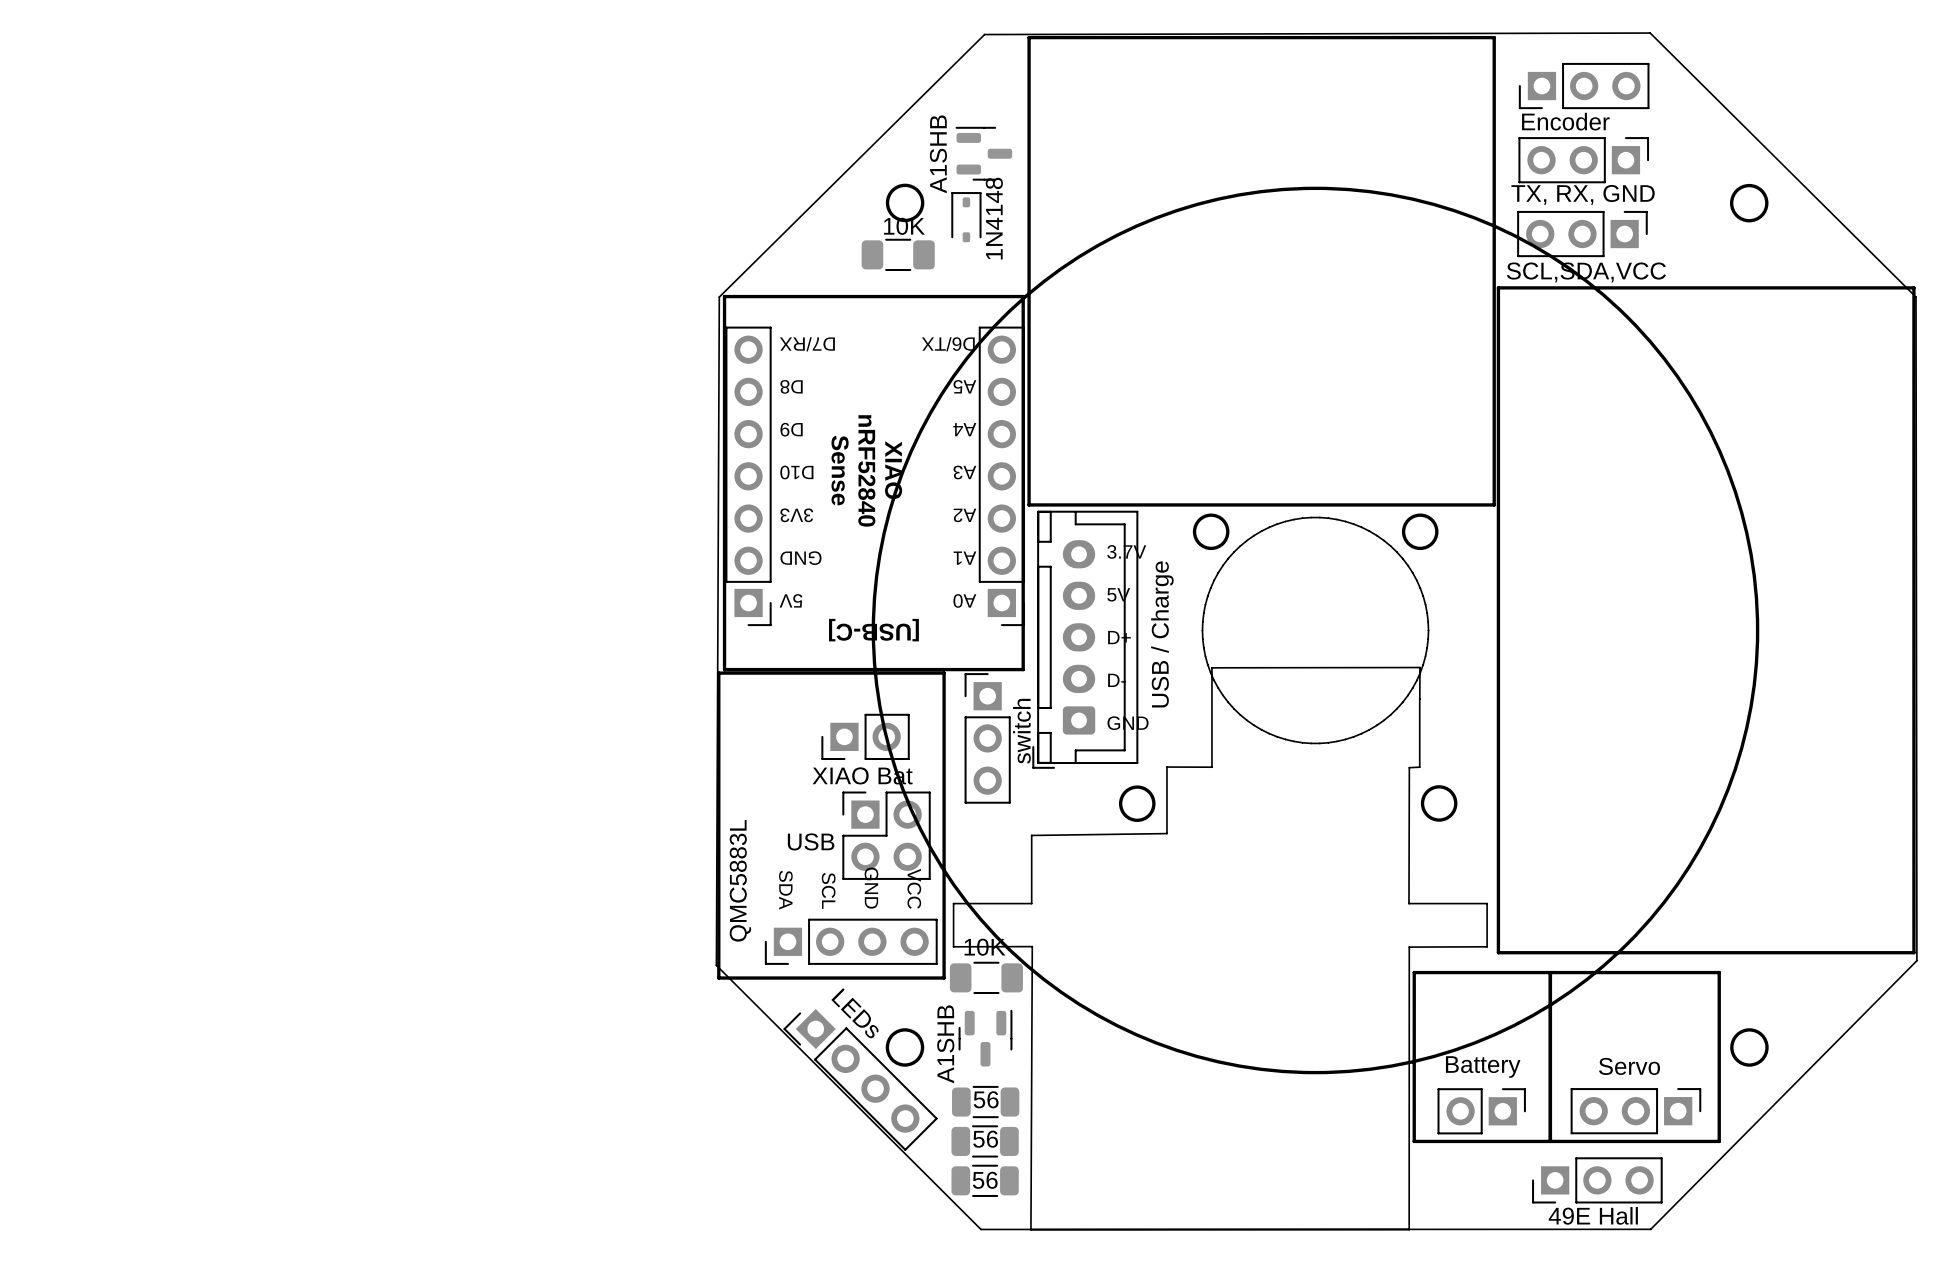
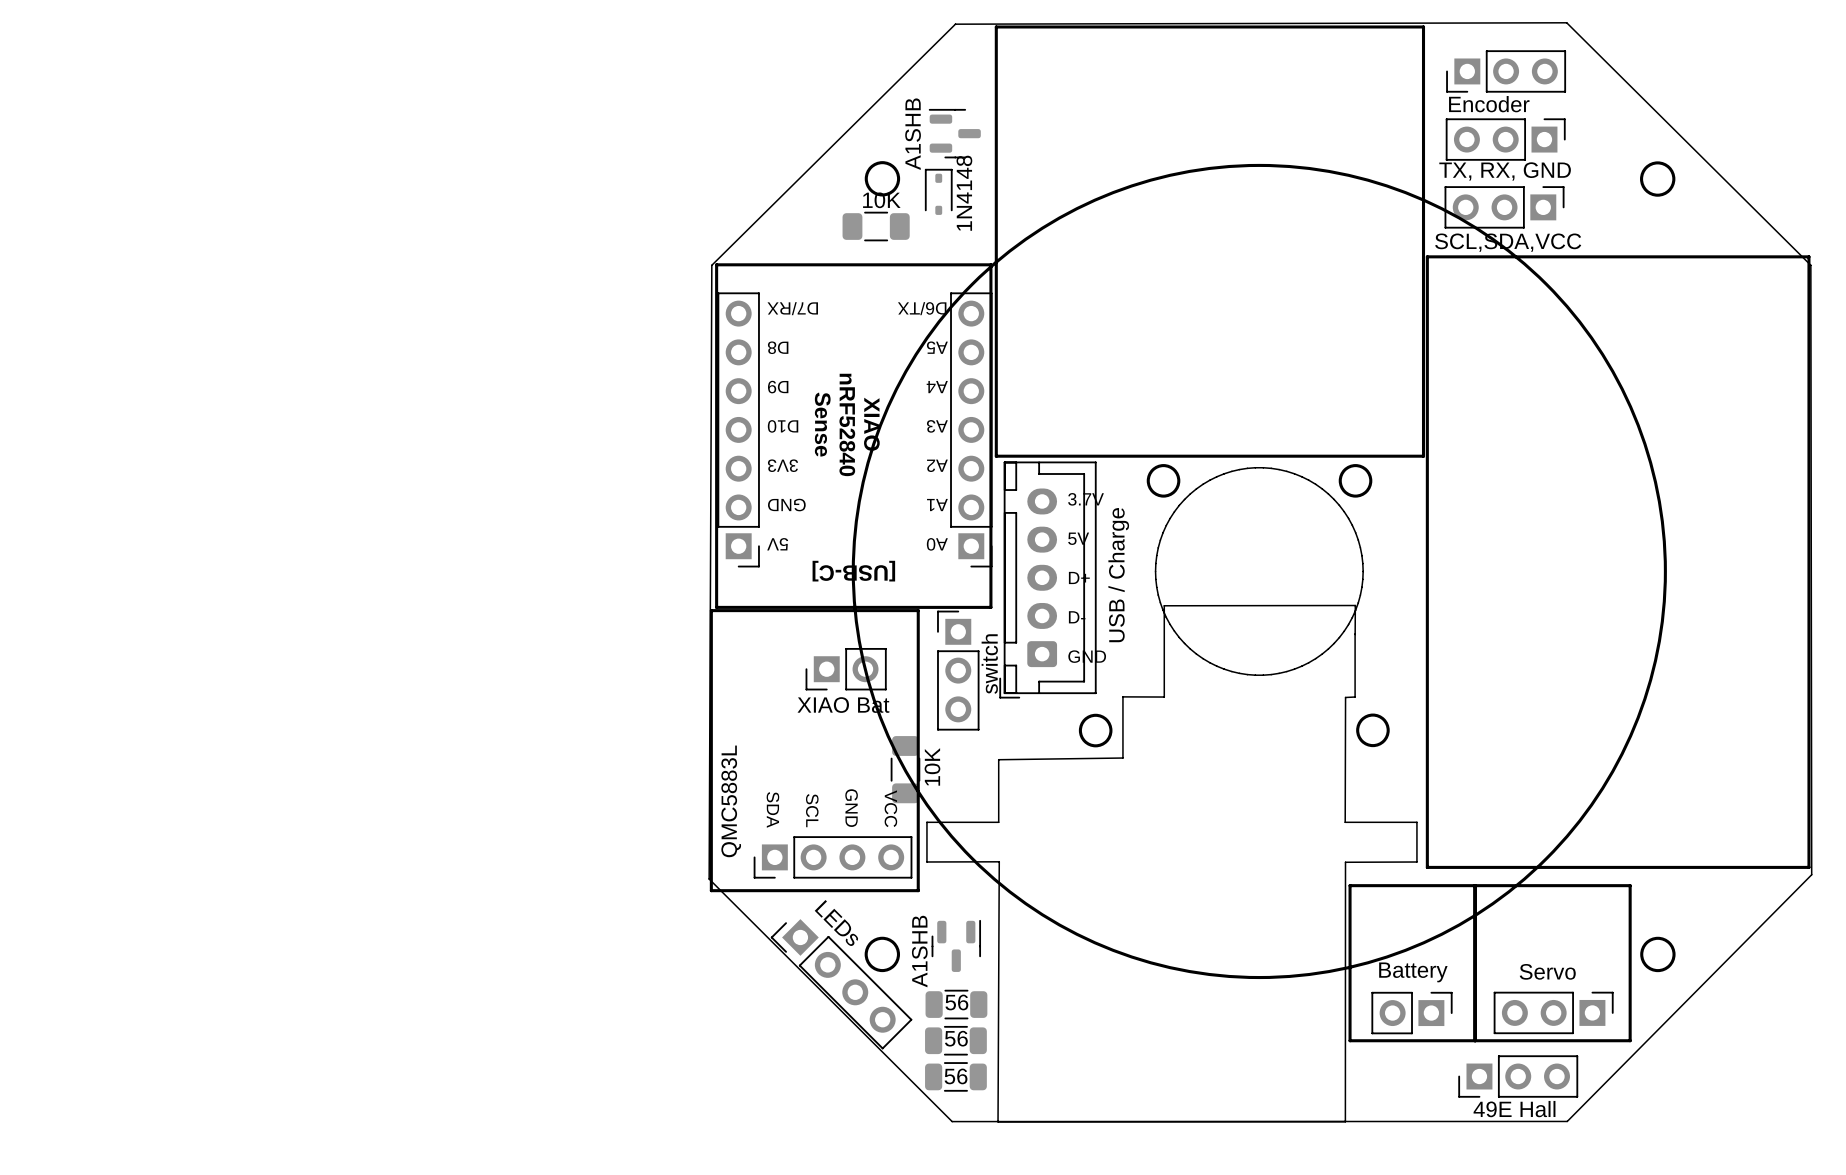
USB: (886, 835) -> none
10K rotation: 0° (986, 977) -> 90° clockwise (905, 769)
10K position: (986, 977) -> (905, 769)

